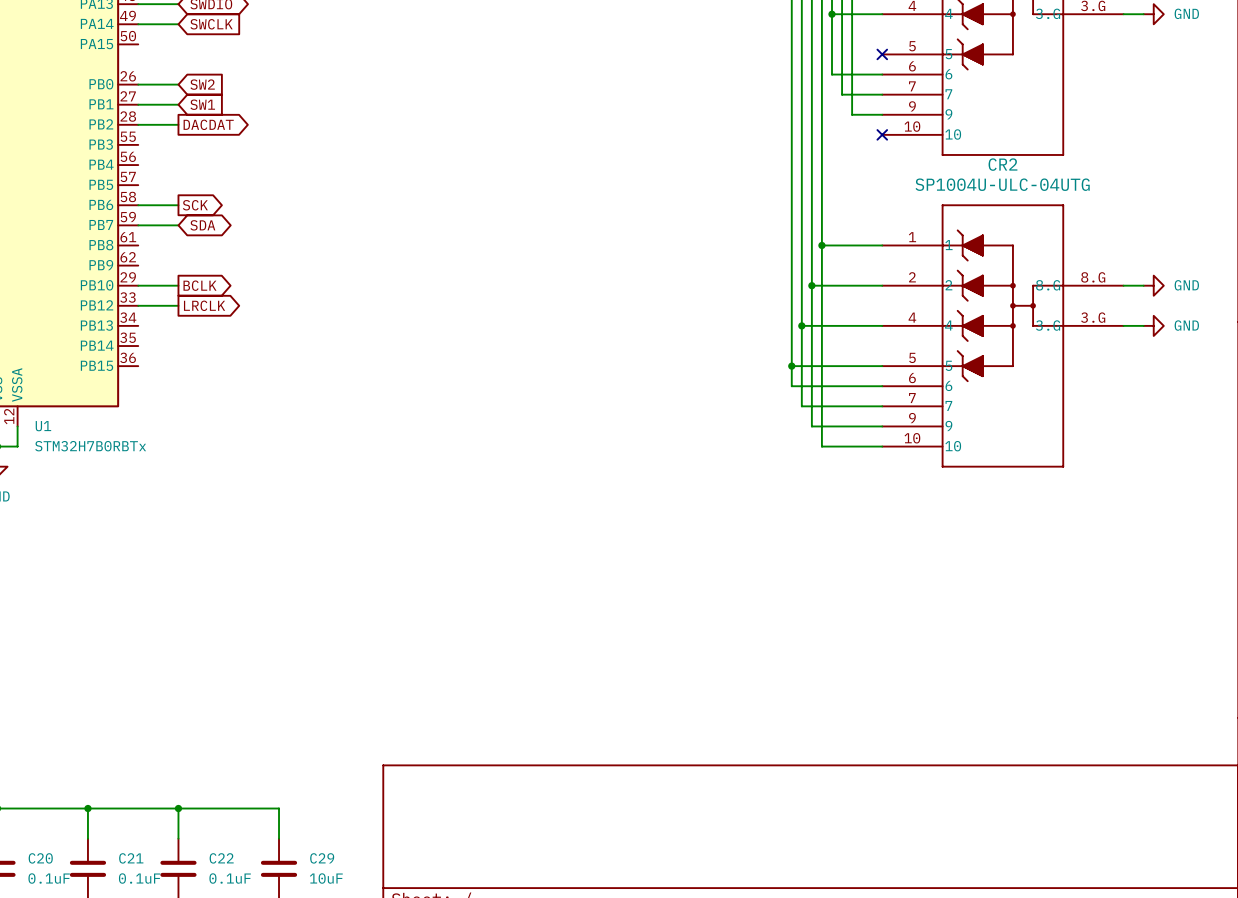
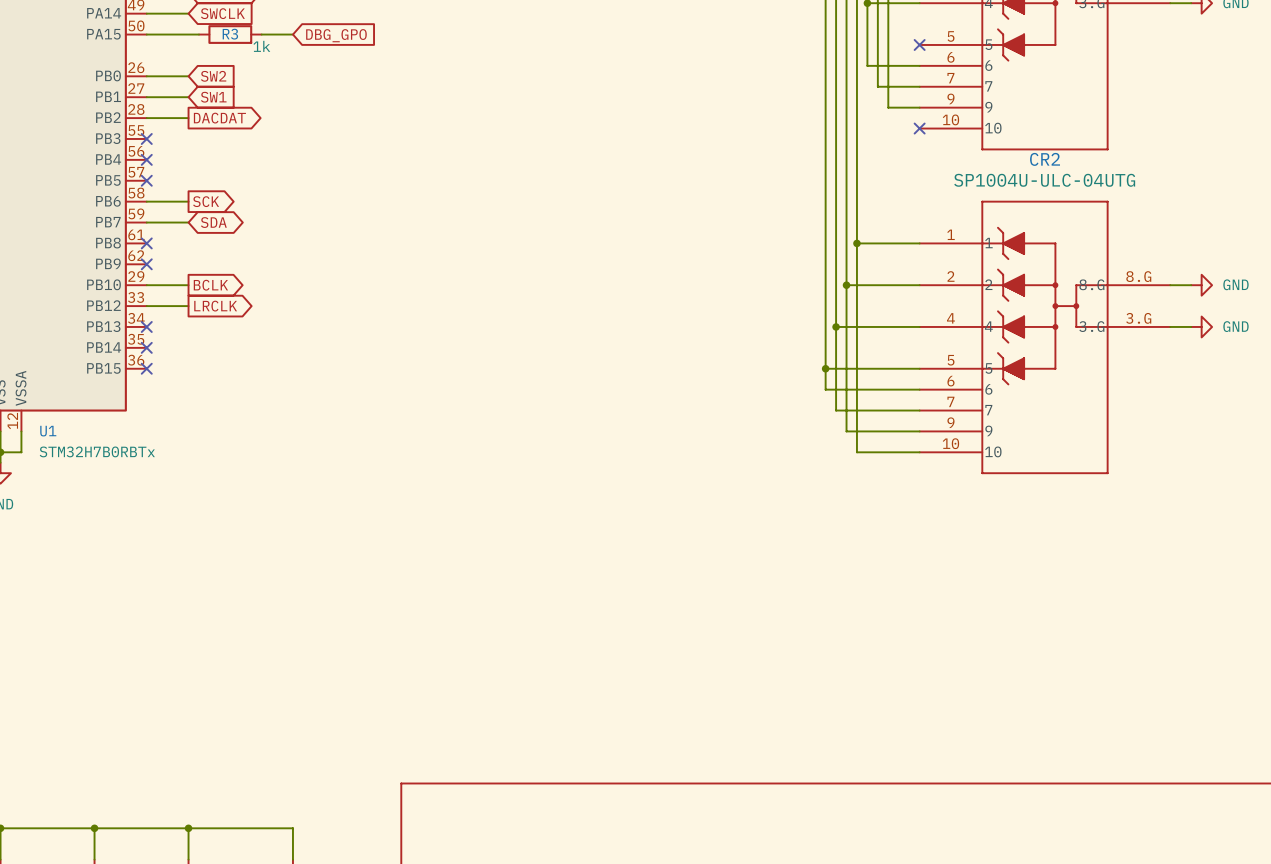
wire: none -> (146, 34) (198, 34)
R3: none -> 1k (230, 34)
wire: none -> (261, 34) (292, 34)
global label: none -> DBG_GPO (336, 35)
no-connect mark: none -> (146, 138)
no-connect mark: none -> (146, 159)
no-connect mark: none -> (146, 180)
no-connect mark: none -> (146, 243)
no-connect mark: none -> (146, 264)
no-connect mark: none -> (146, 326)
no-connect mark: none -> (146, 347)
no-connect mark: none -> (146, 368)

